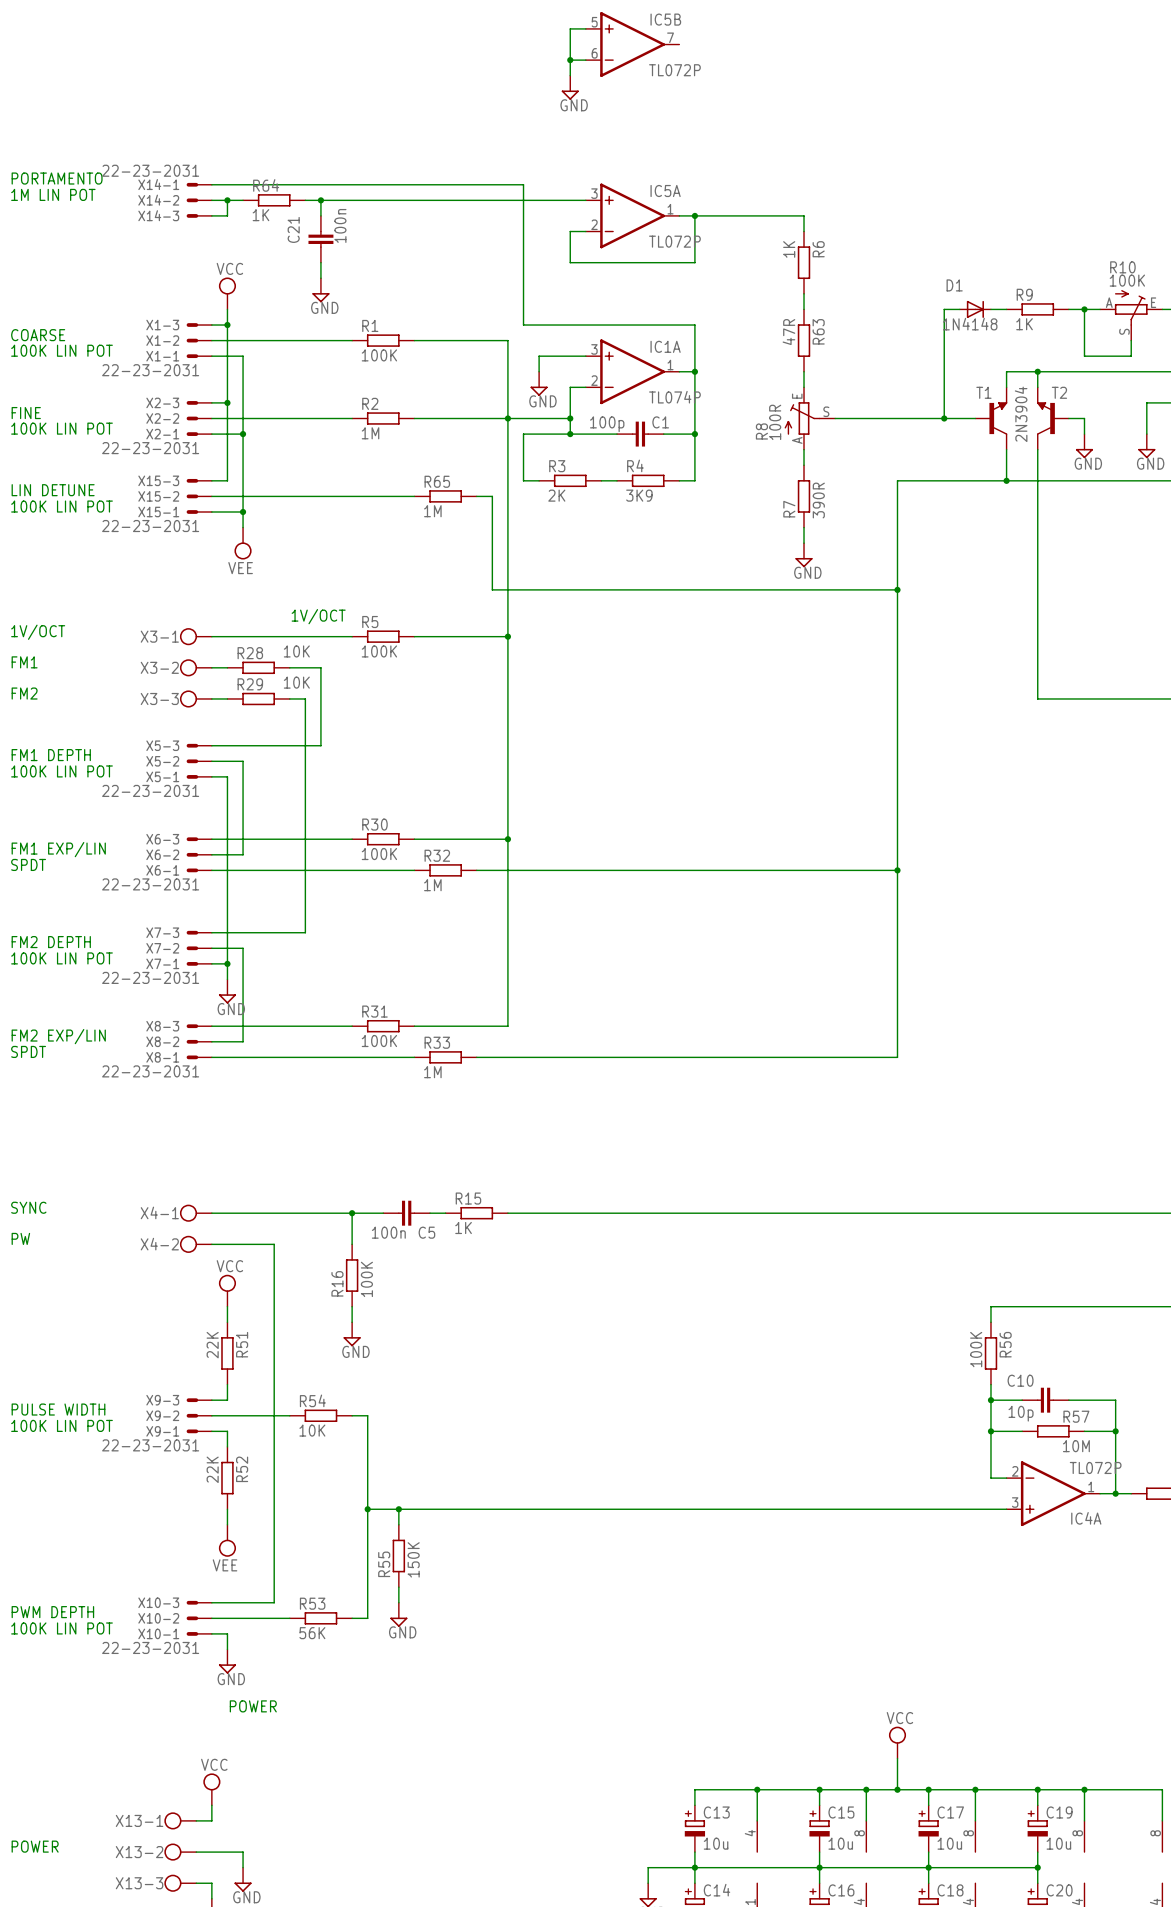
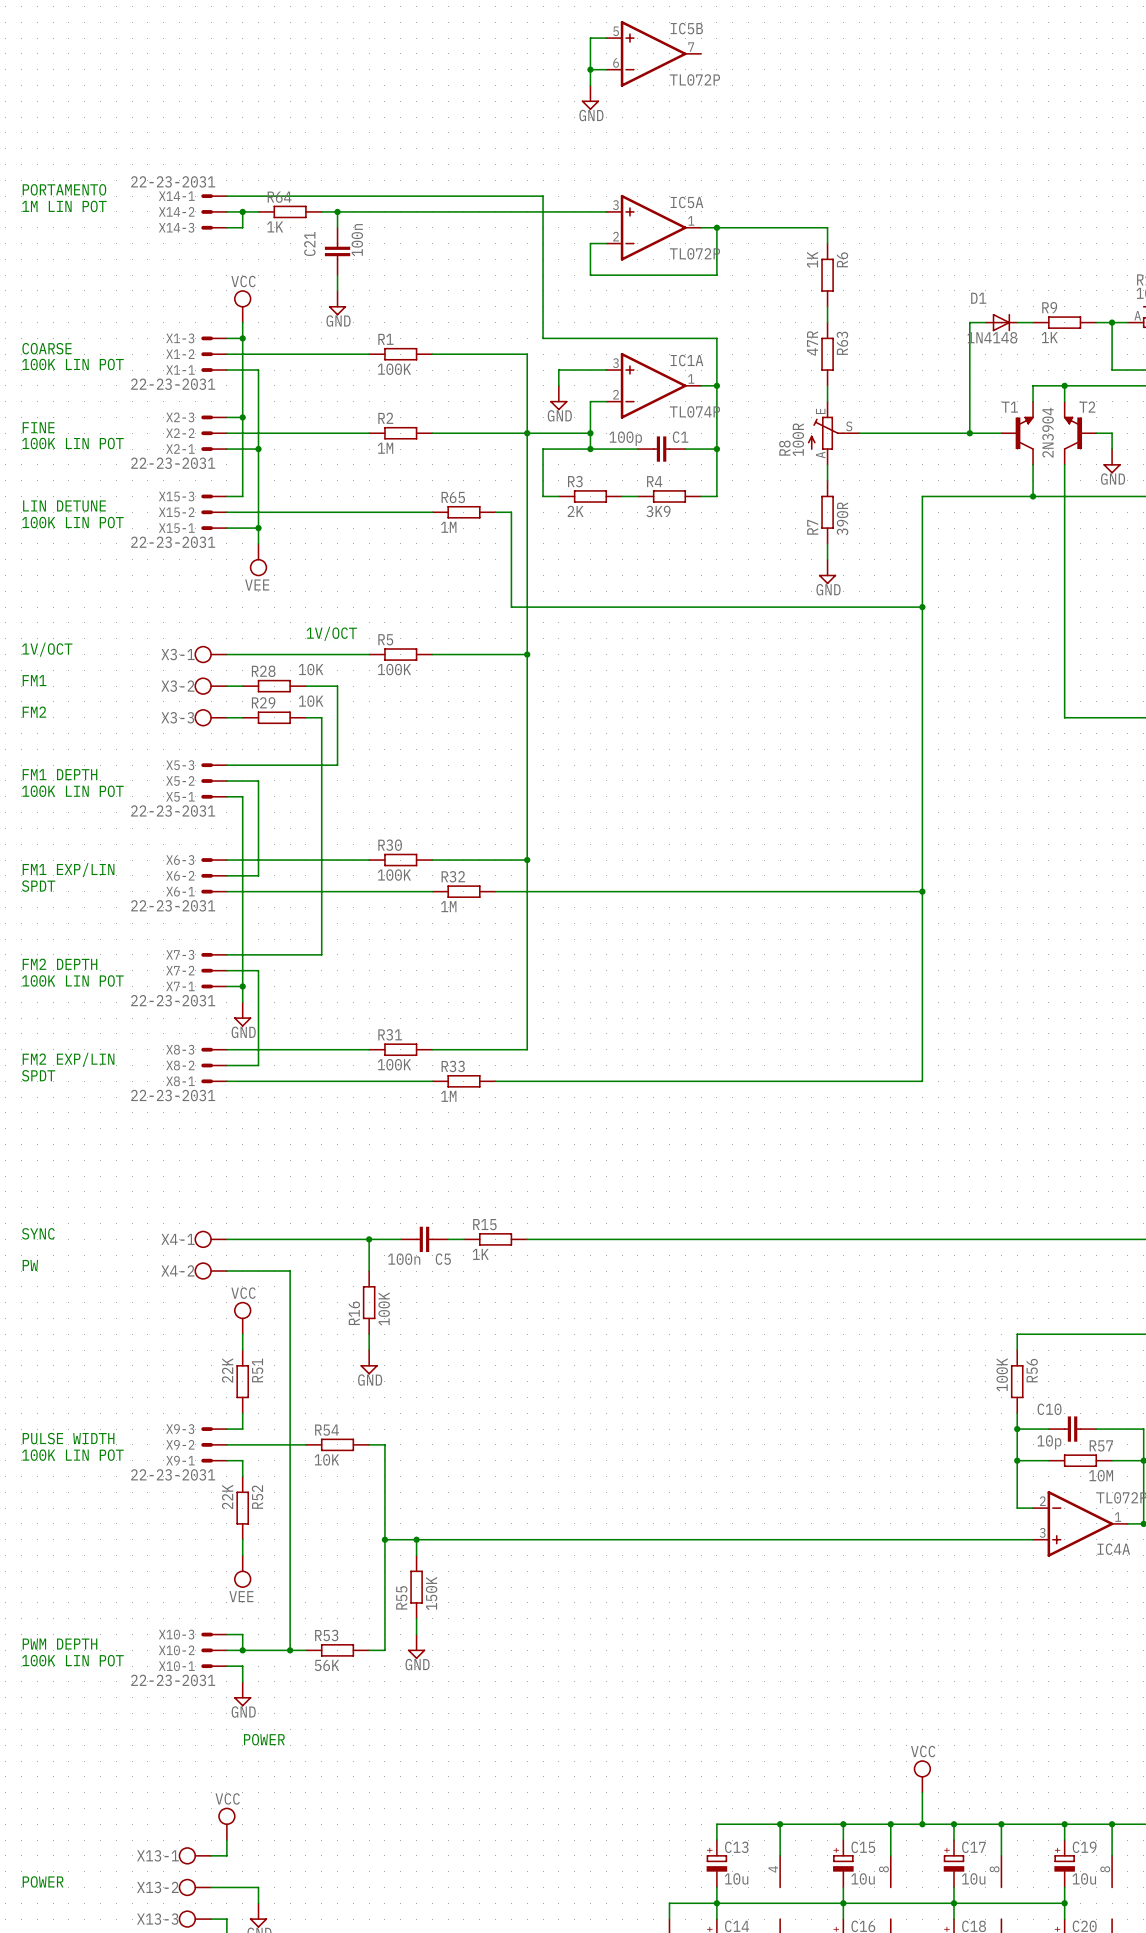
wire: (227, 1602) (274, 1602) -> (242, 1634) (242, 1650)
wire: none -> (290, 1634) (290, 1650)
junction: none -> (242, 1650)
junction: none -> (290, 1650)

